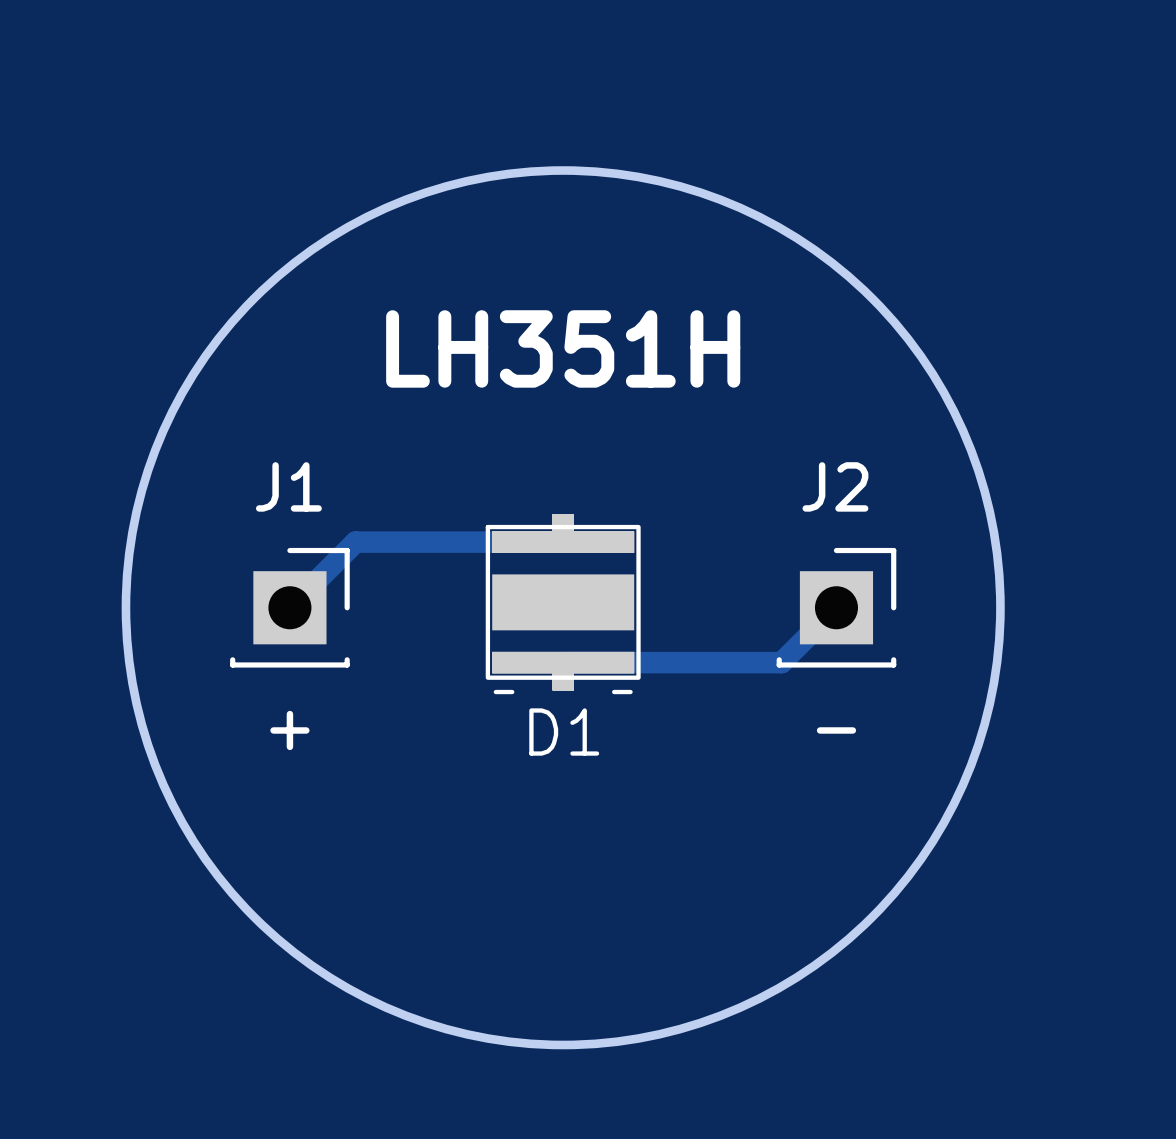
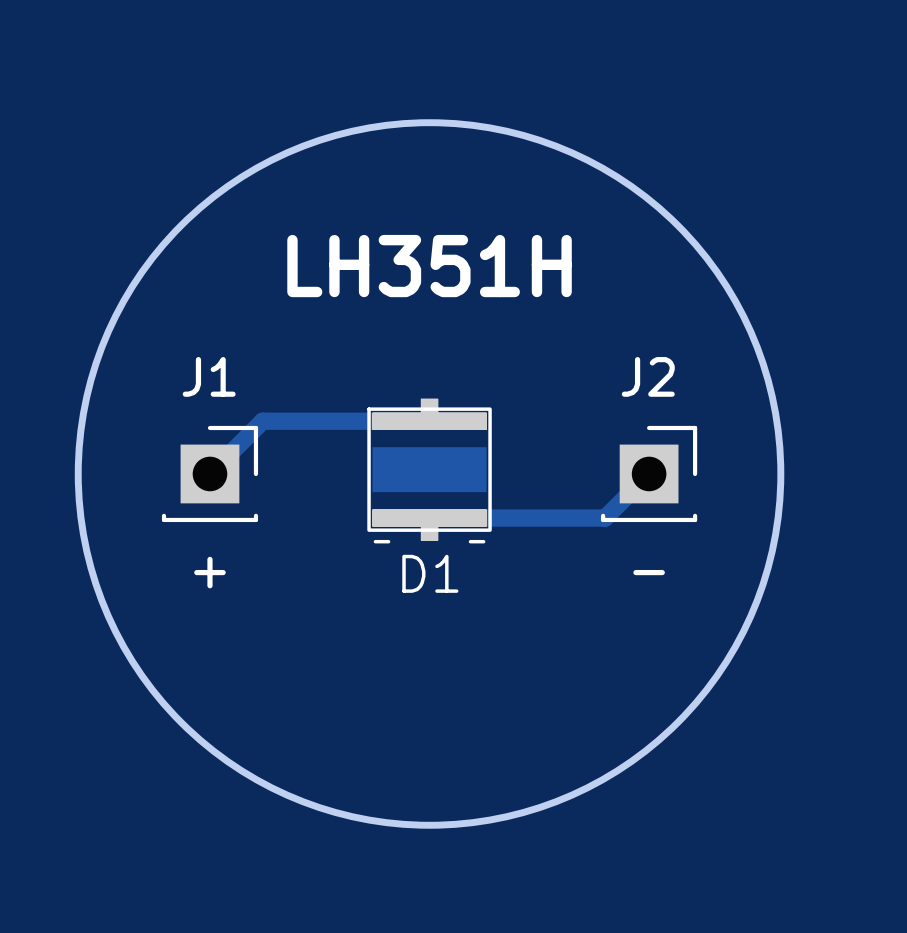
D1 footprint: [485, 514, 641, 691] -> [367, 398, 492, 541]

